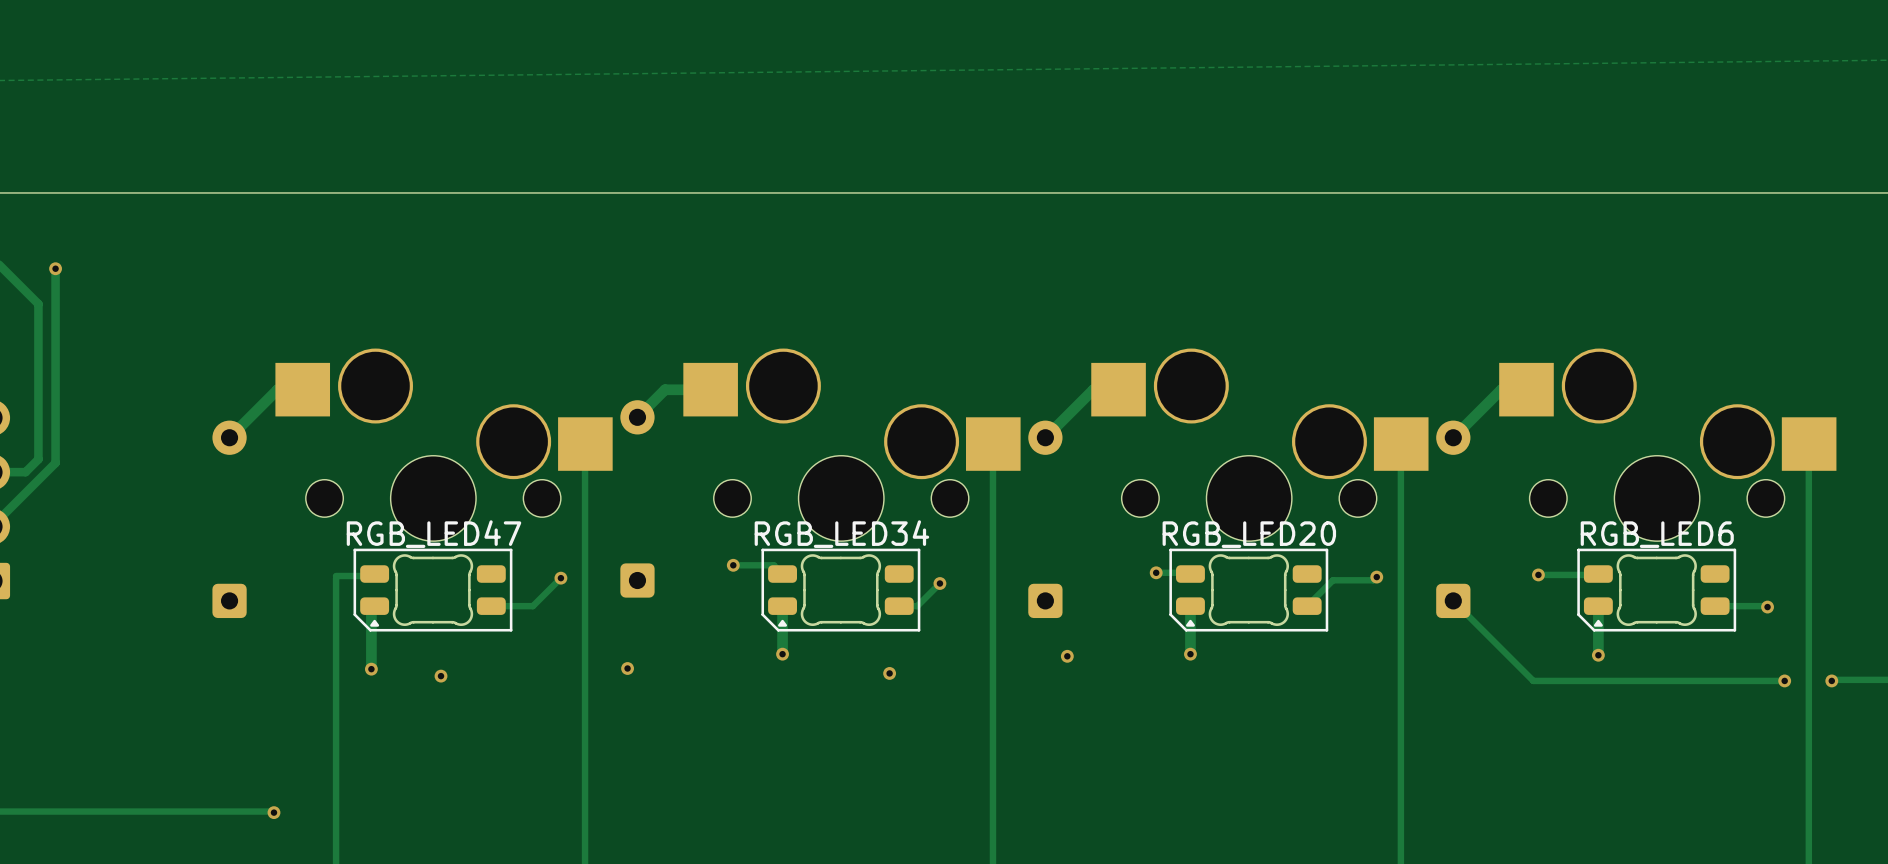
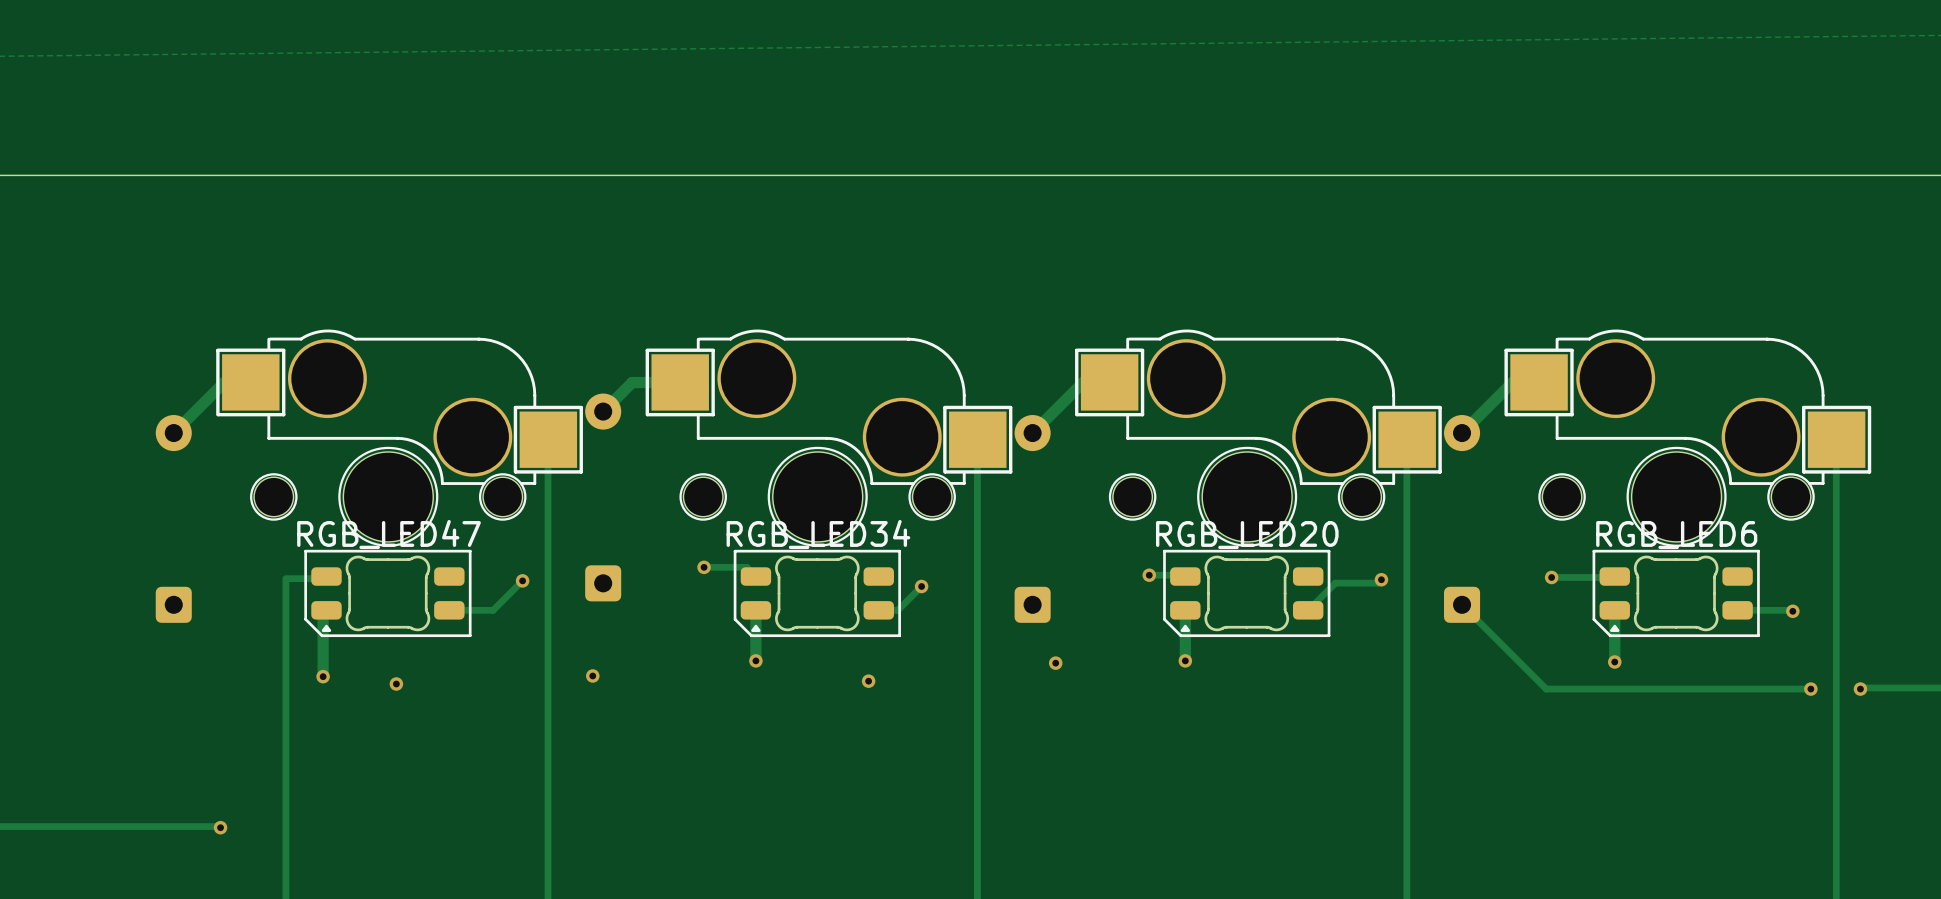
part footprint: [275, 348, 613, 542] -> [216, 329, 583, 547]
part footprint: [683, 348, 1021, 542] -> [645, 329, 1013, 547]
part footprint: [1091, 348, 1429, 542] -> [1075, 329, 1442, 547]
part footprint: [1499, 348, 1837, 542] -> [1504, 329, 1872, 547]

